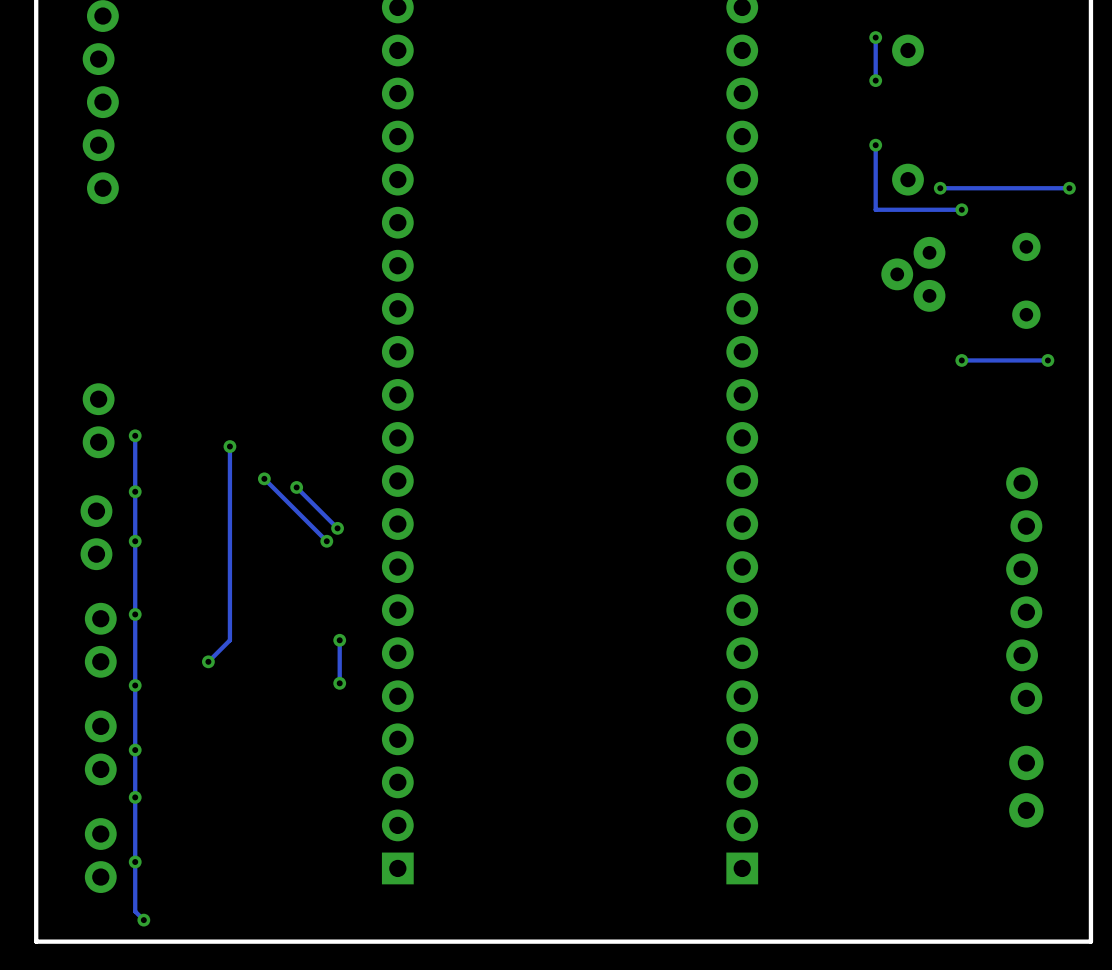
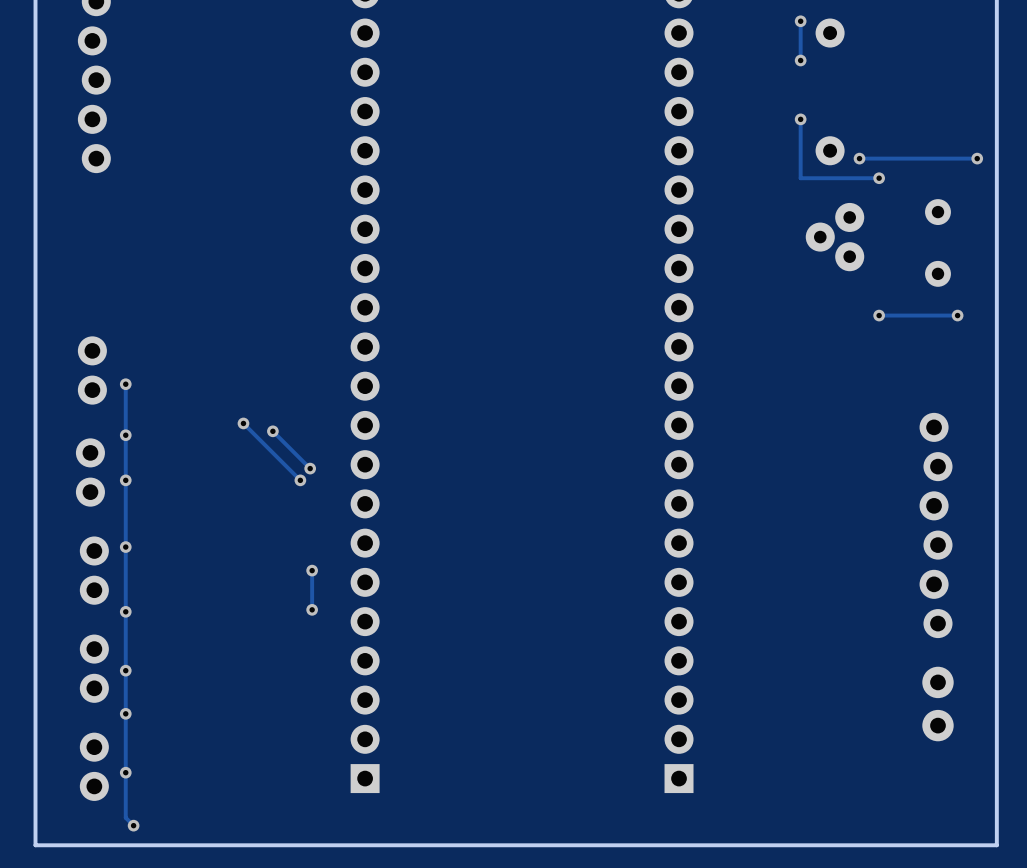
track: (229, 446) (229, 640) (208, 661) -> none
via: (229, 446) -> none
via: (208, 661) -> none

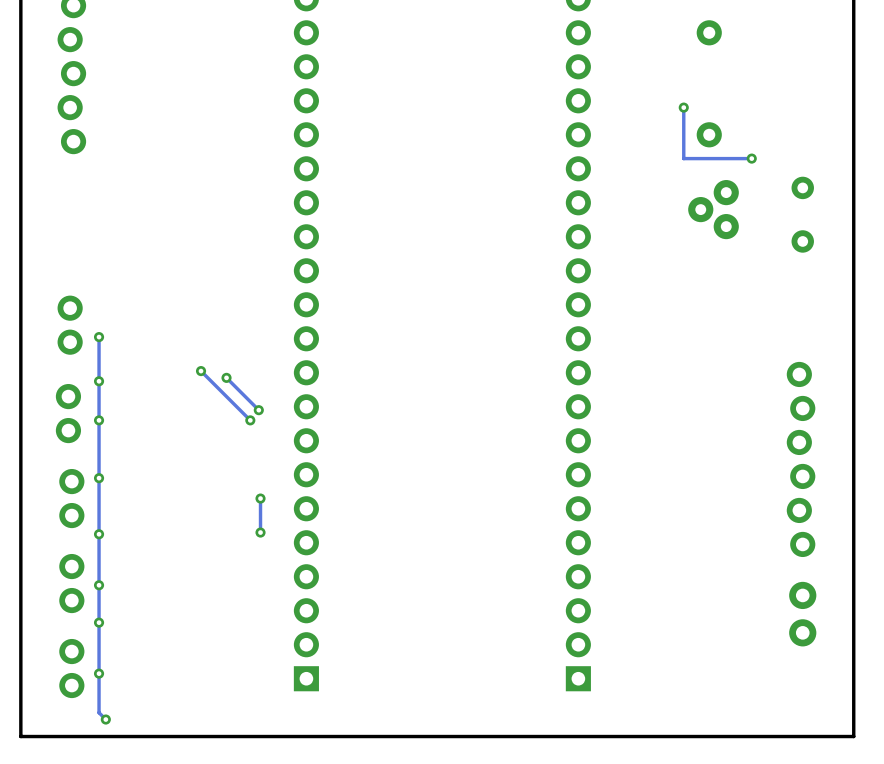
track: (800, 21) (800, 60) -> none
via: (800, 21) -> none
via: (800, 60) -> none
via: (859, 158) -> none
track: (977, 158) (859, 158) -> none
via: (977, 158) -> none
via: (879, 315) -> none
track: (957, 315) (879, 315) -> none
via: (957, 315) -> none

